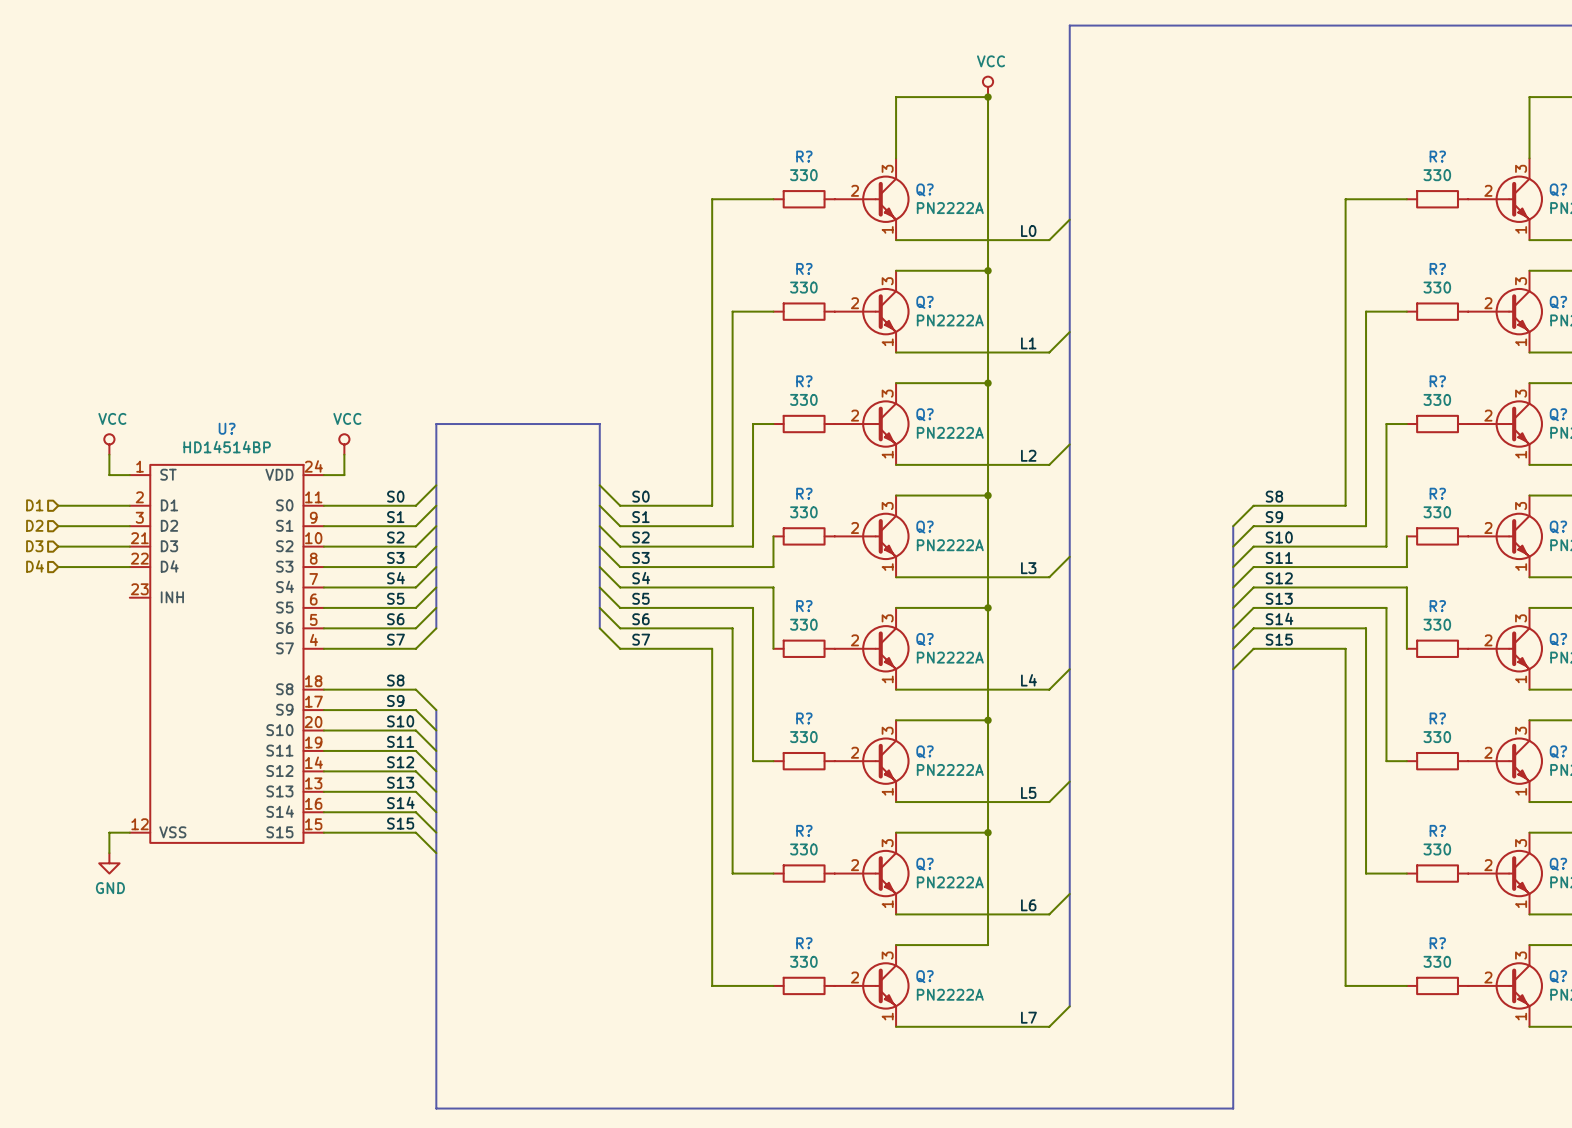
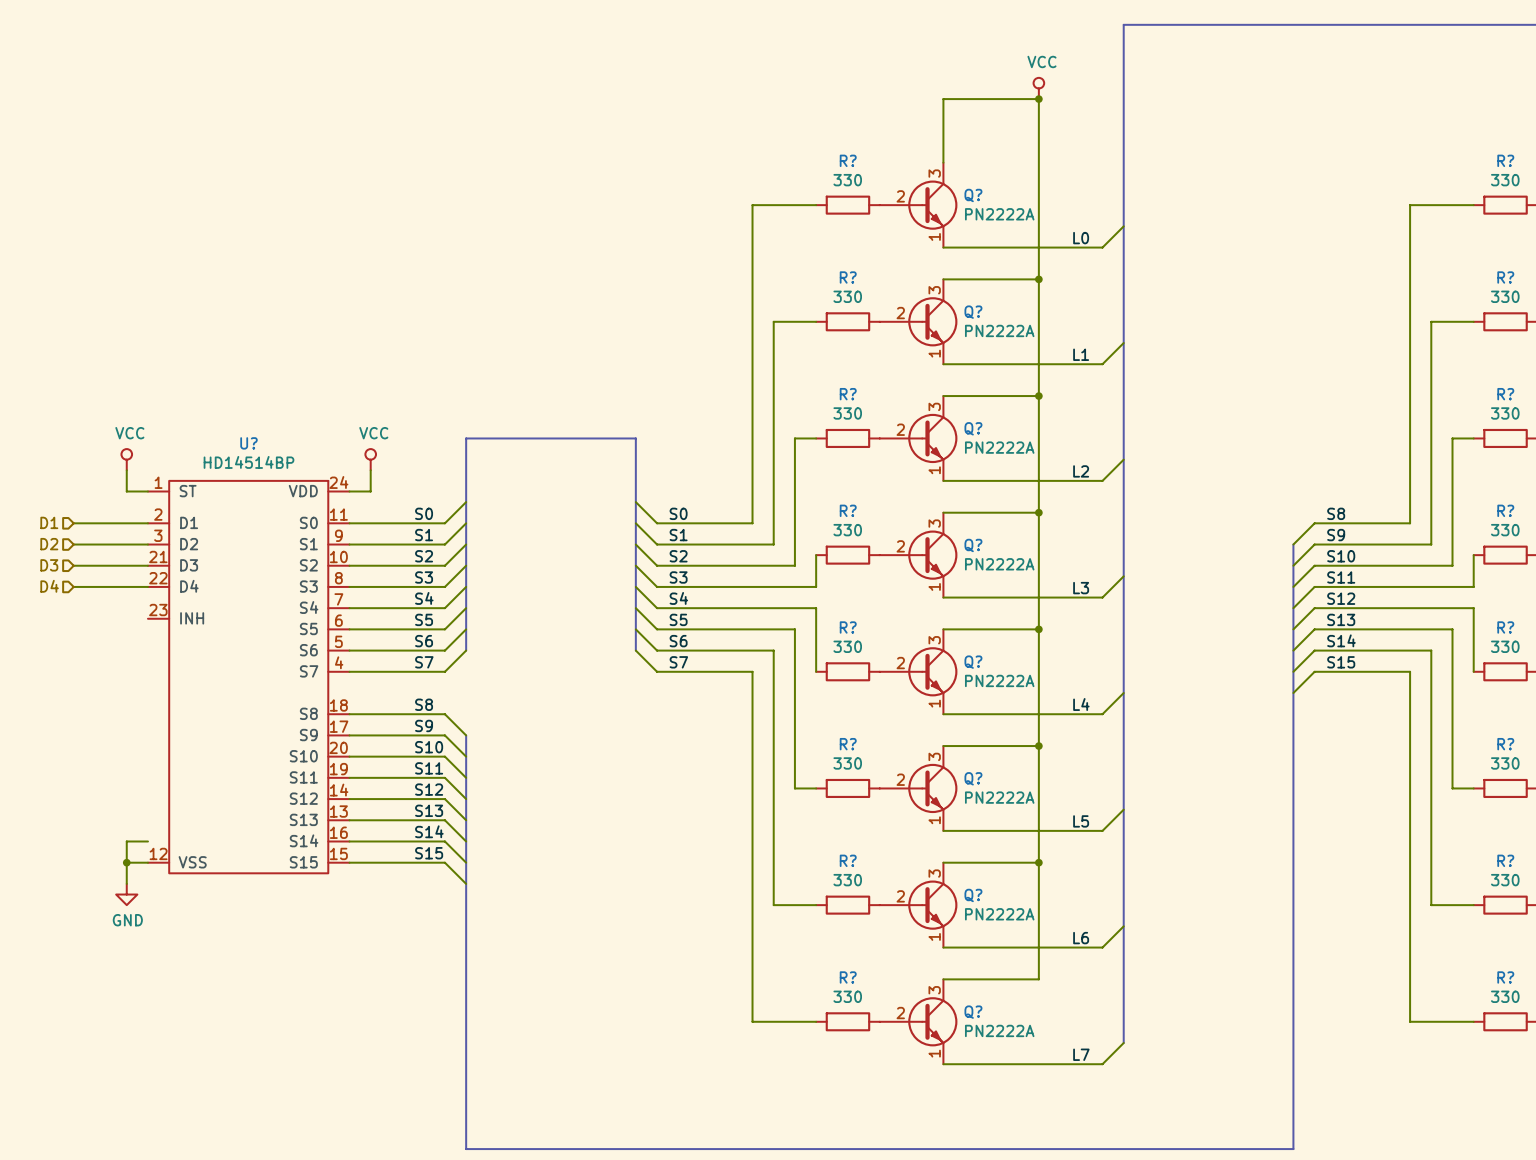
wire: none -> (147, 841) (126, 841) (126, 862)
junction: none -> (126, 862)

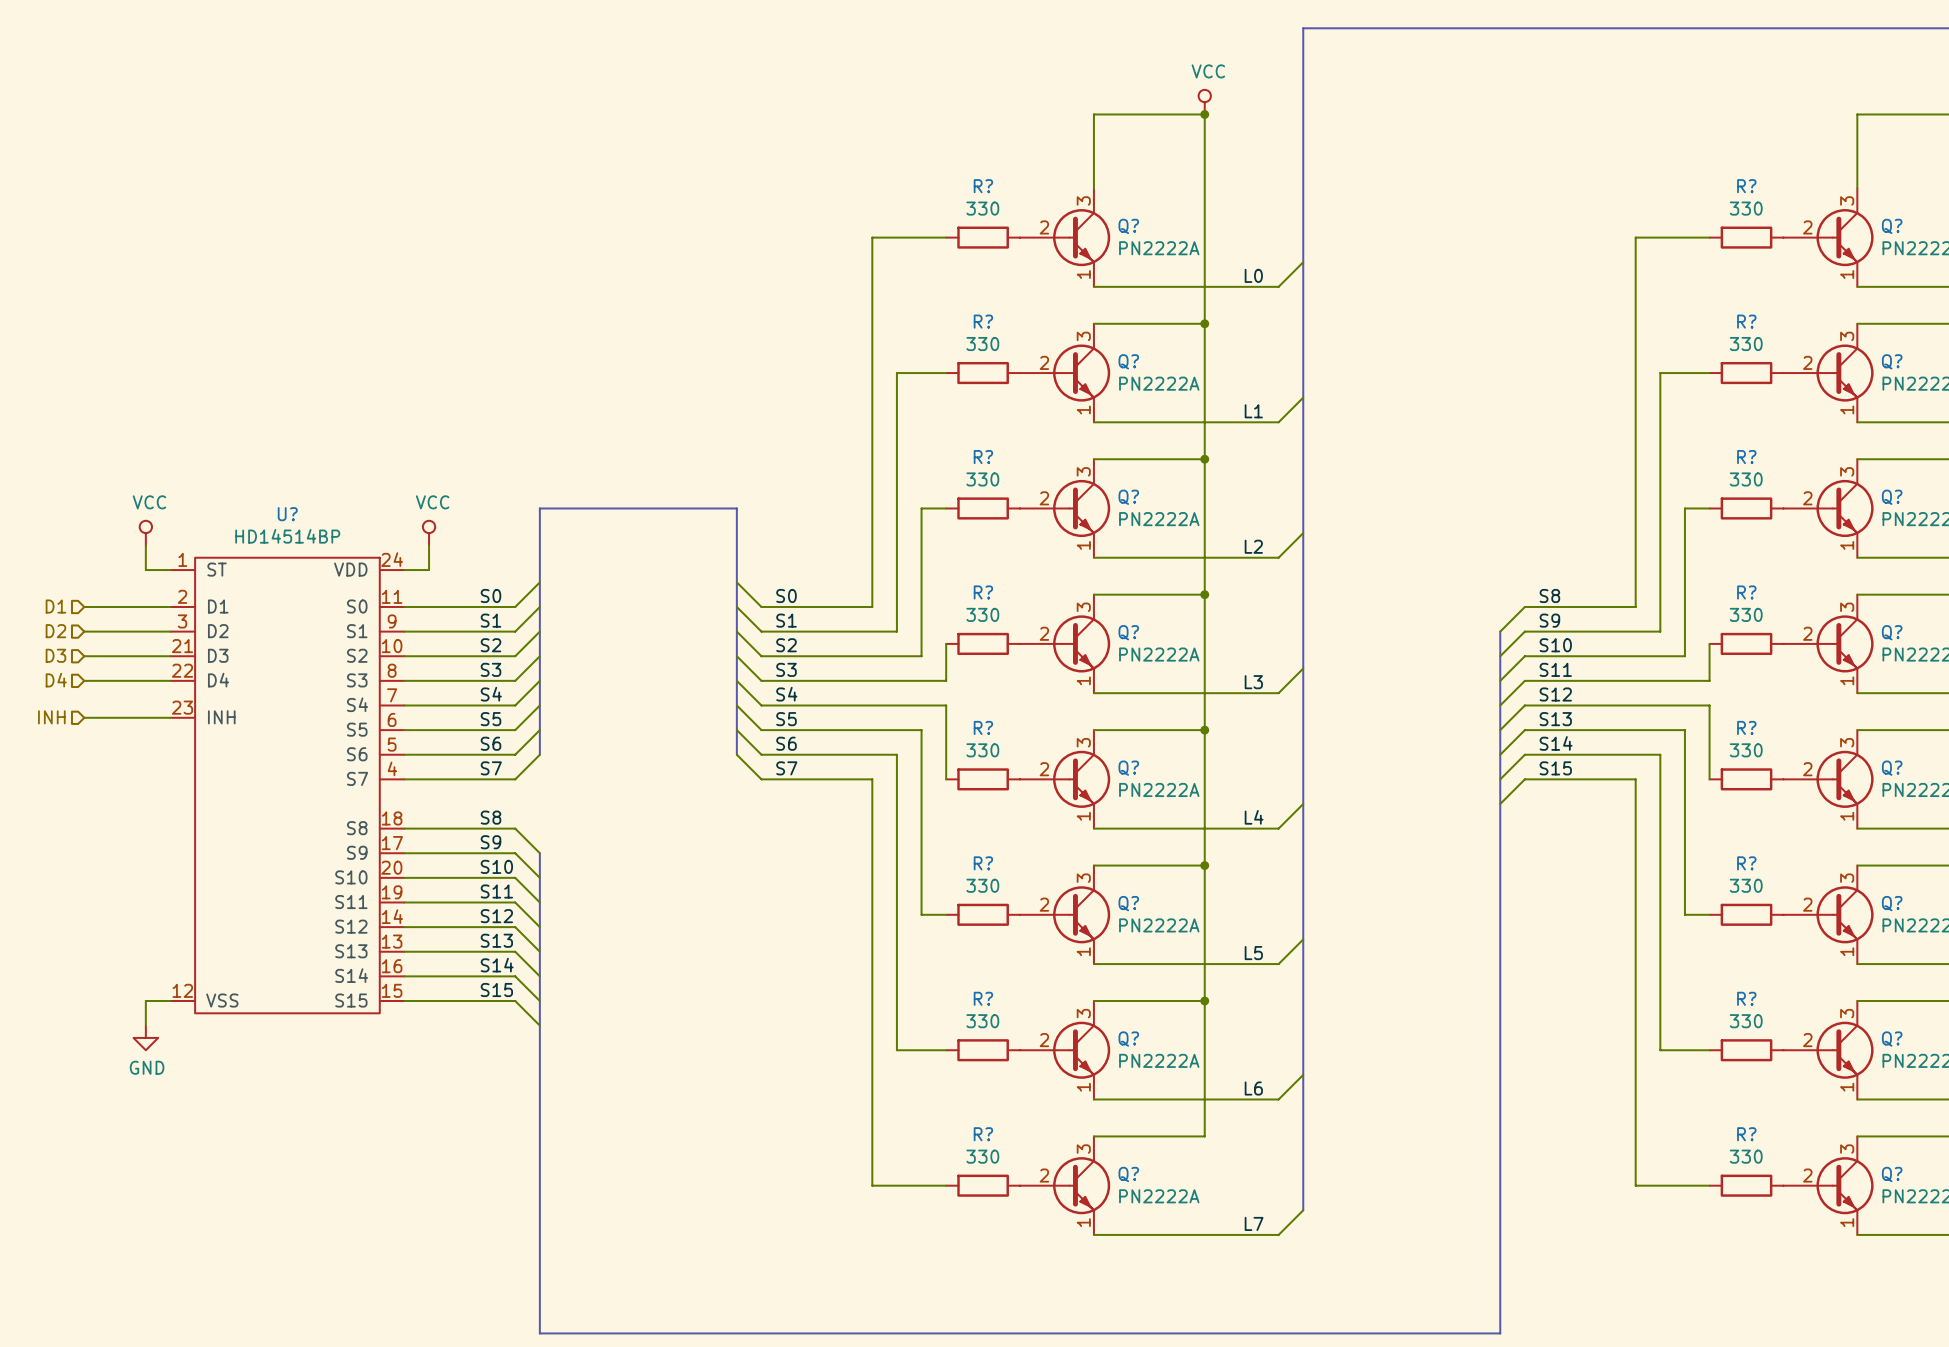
hierarchical label: none -> INH (51, 717)
wire: none -> (84, 717) (170, 717)
wire: (147, 841) (126, 841) (126, 862) -> none
junction: (126, 862) -> none

